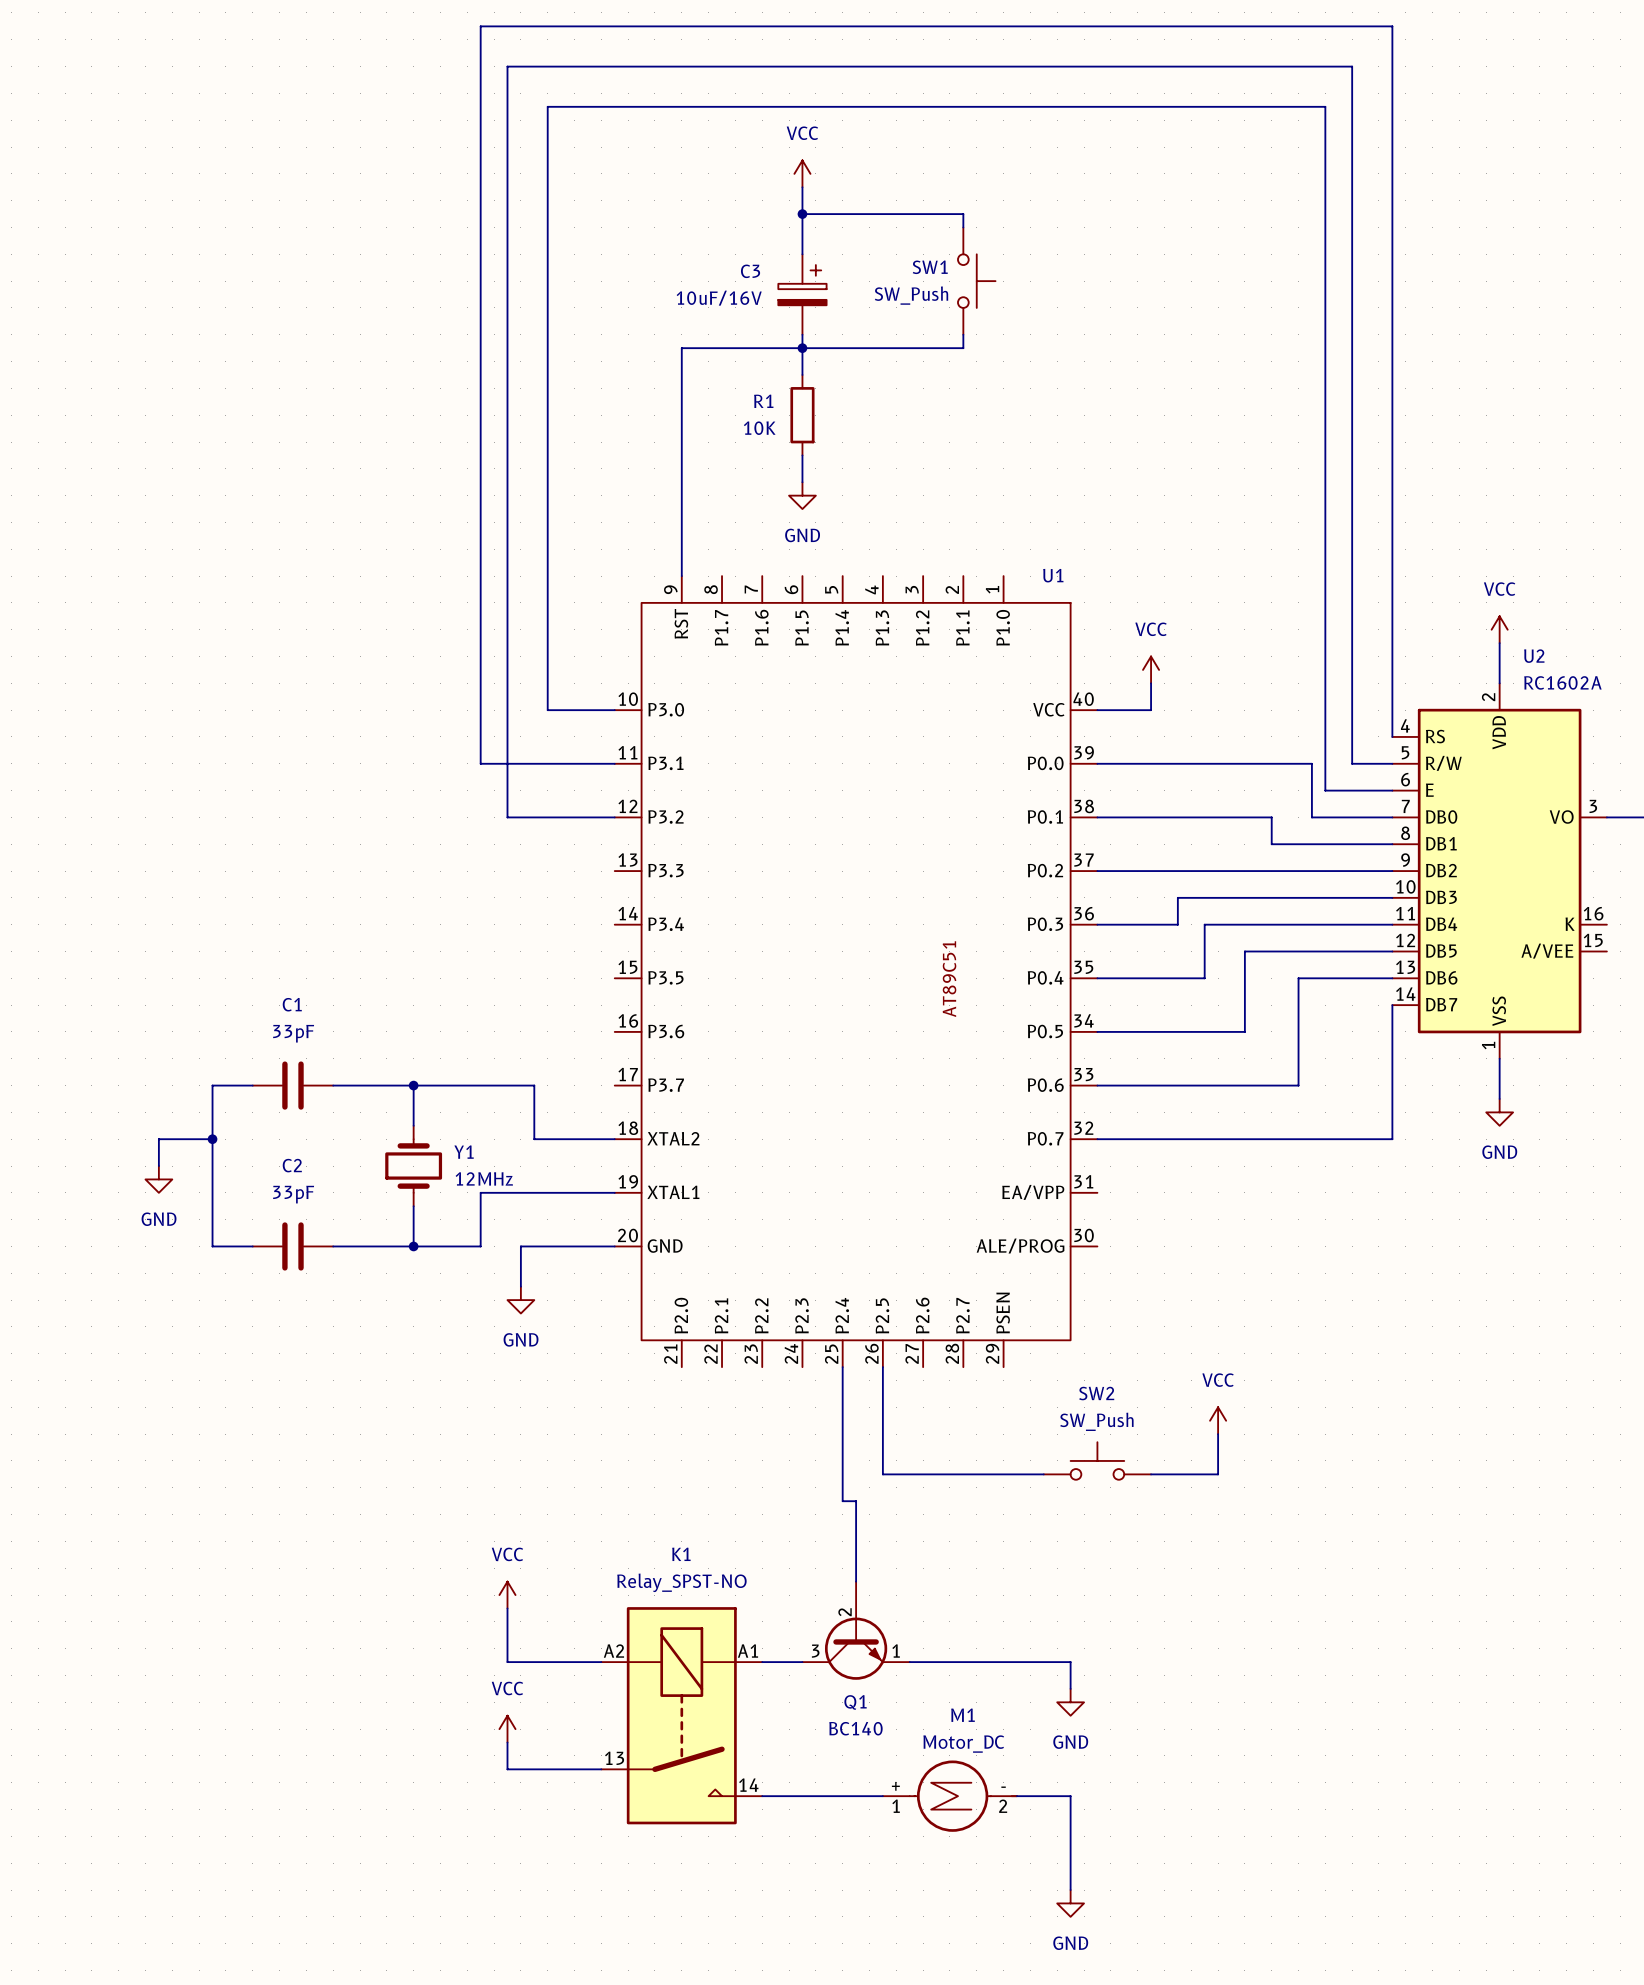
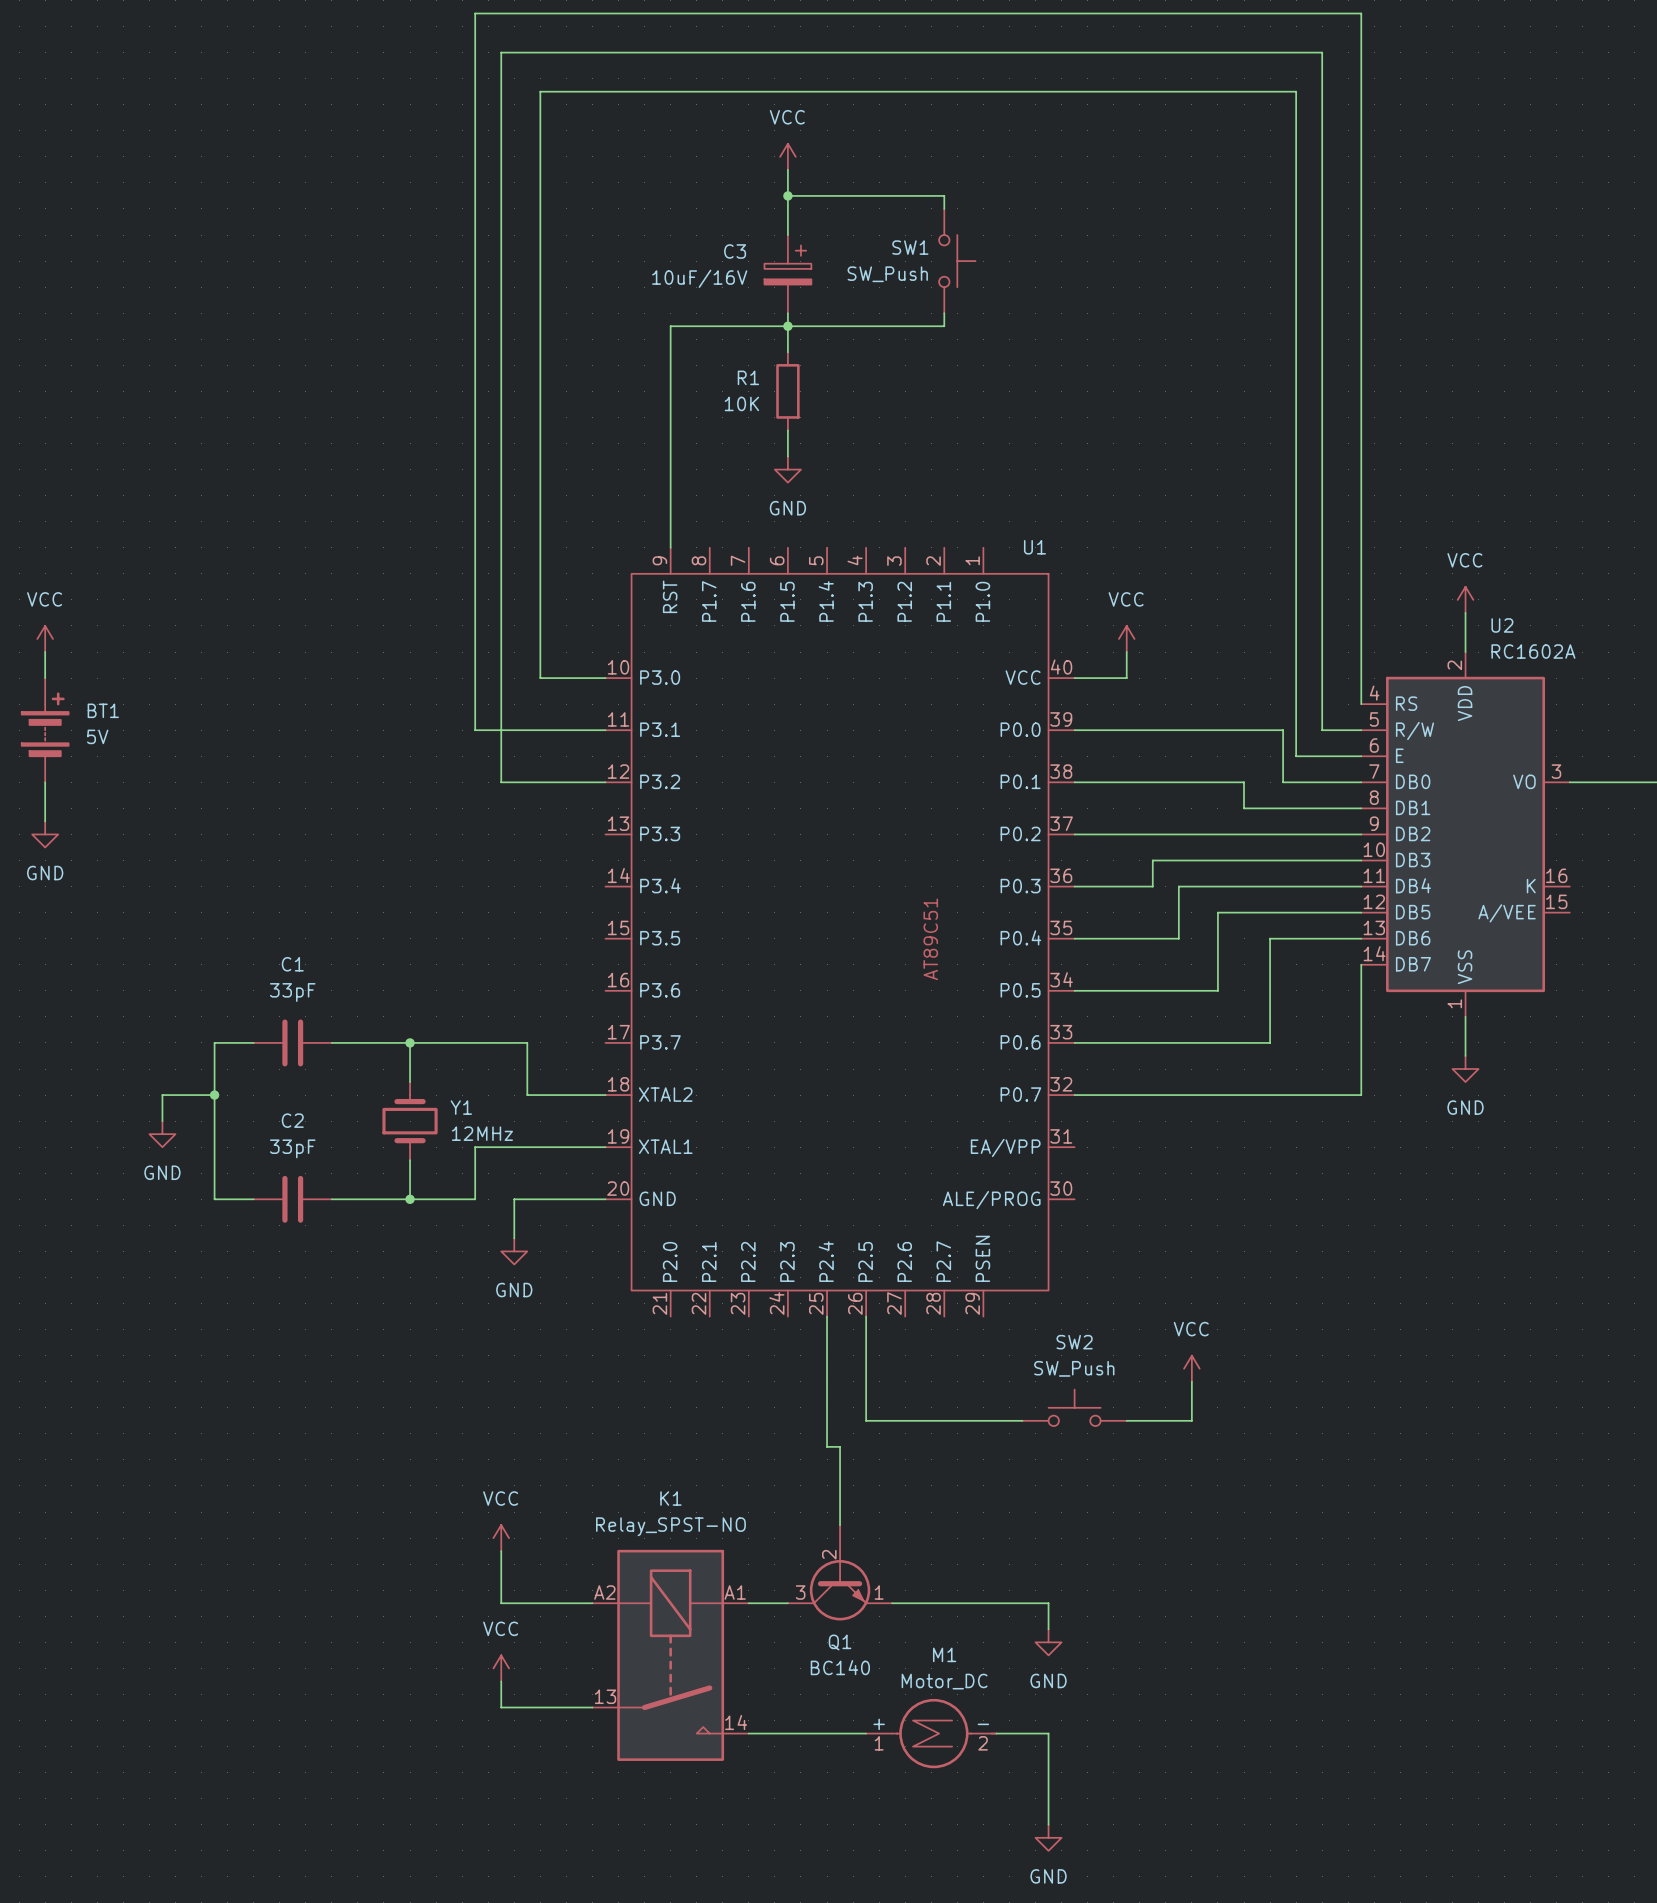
power symbol: none -> VCC (45, 638)
wire: none -> (45, 652) (45, 678)
BT1: none -> 5V (45, 730)
wire: none -> (45, 782) (45, 821)
power symbol: none -> GND (45, 834)

